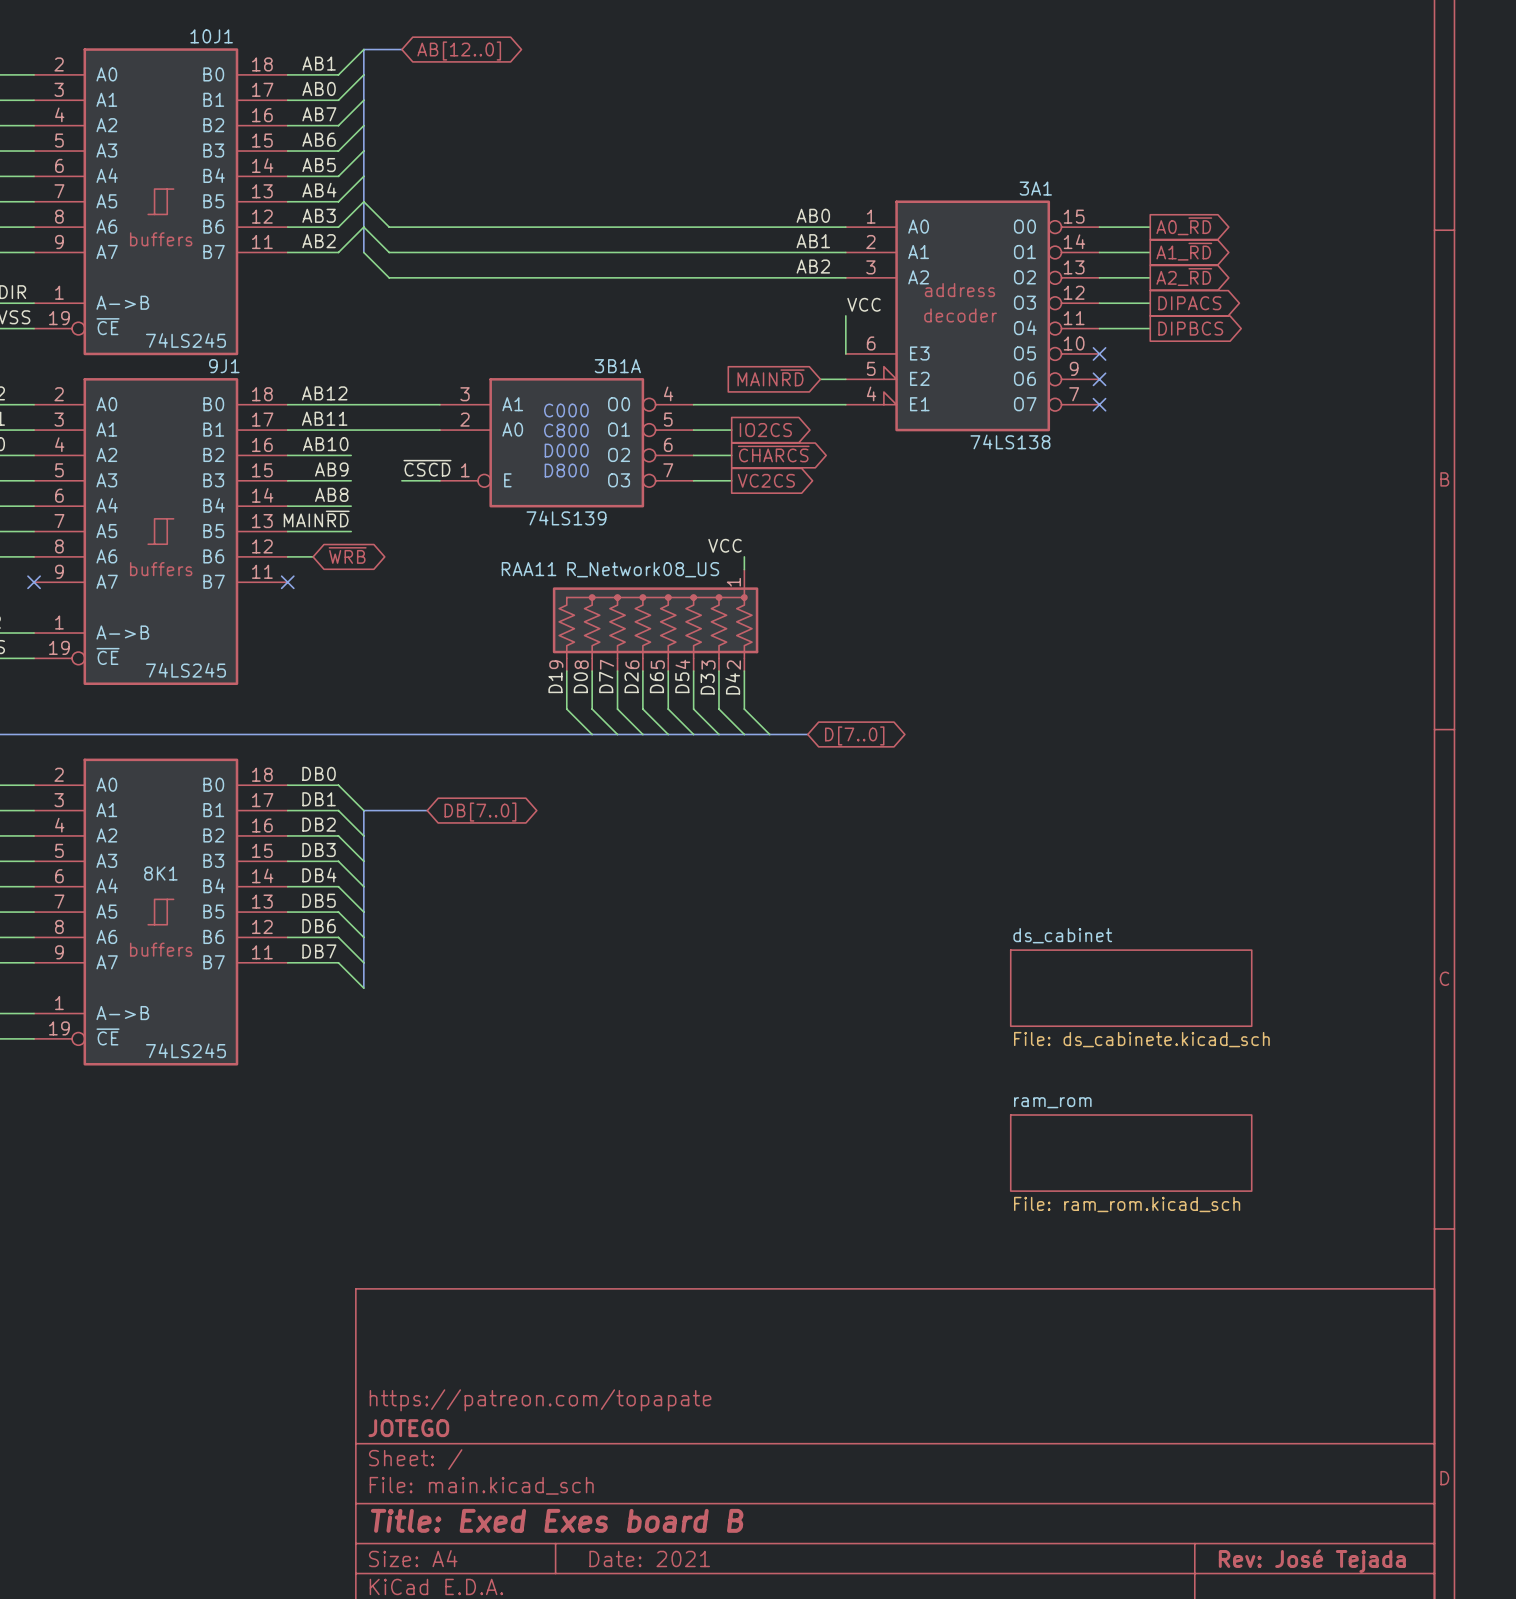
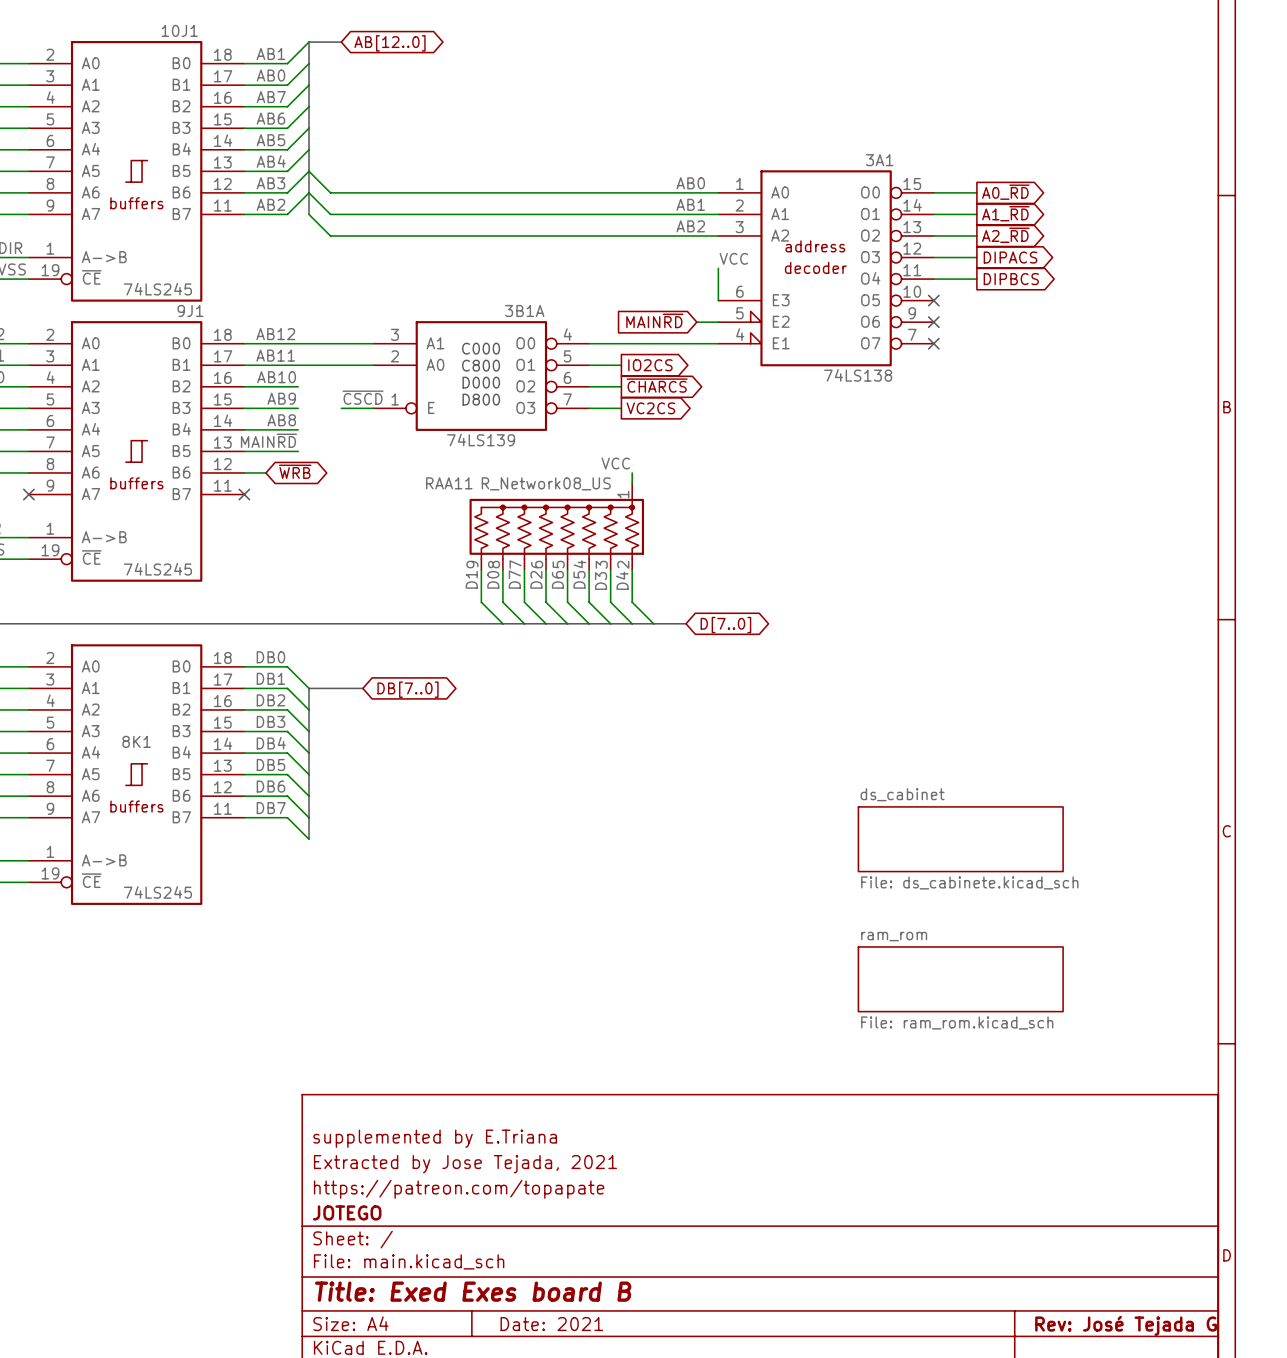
title block: none -> supplemented by E.Triana (435, 1138)
title block: none -> Extracted by Jose Tejada, 2021 (465, 1164)
title block: Rev: José Tejada (1312, 1561) -> Rev: José Tejada G (1126, 1325)

